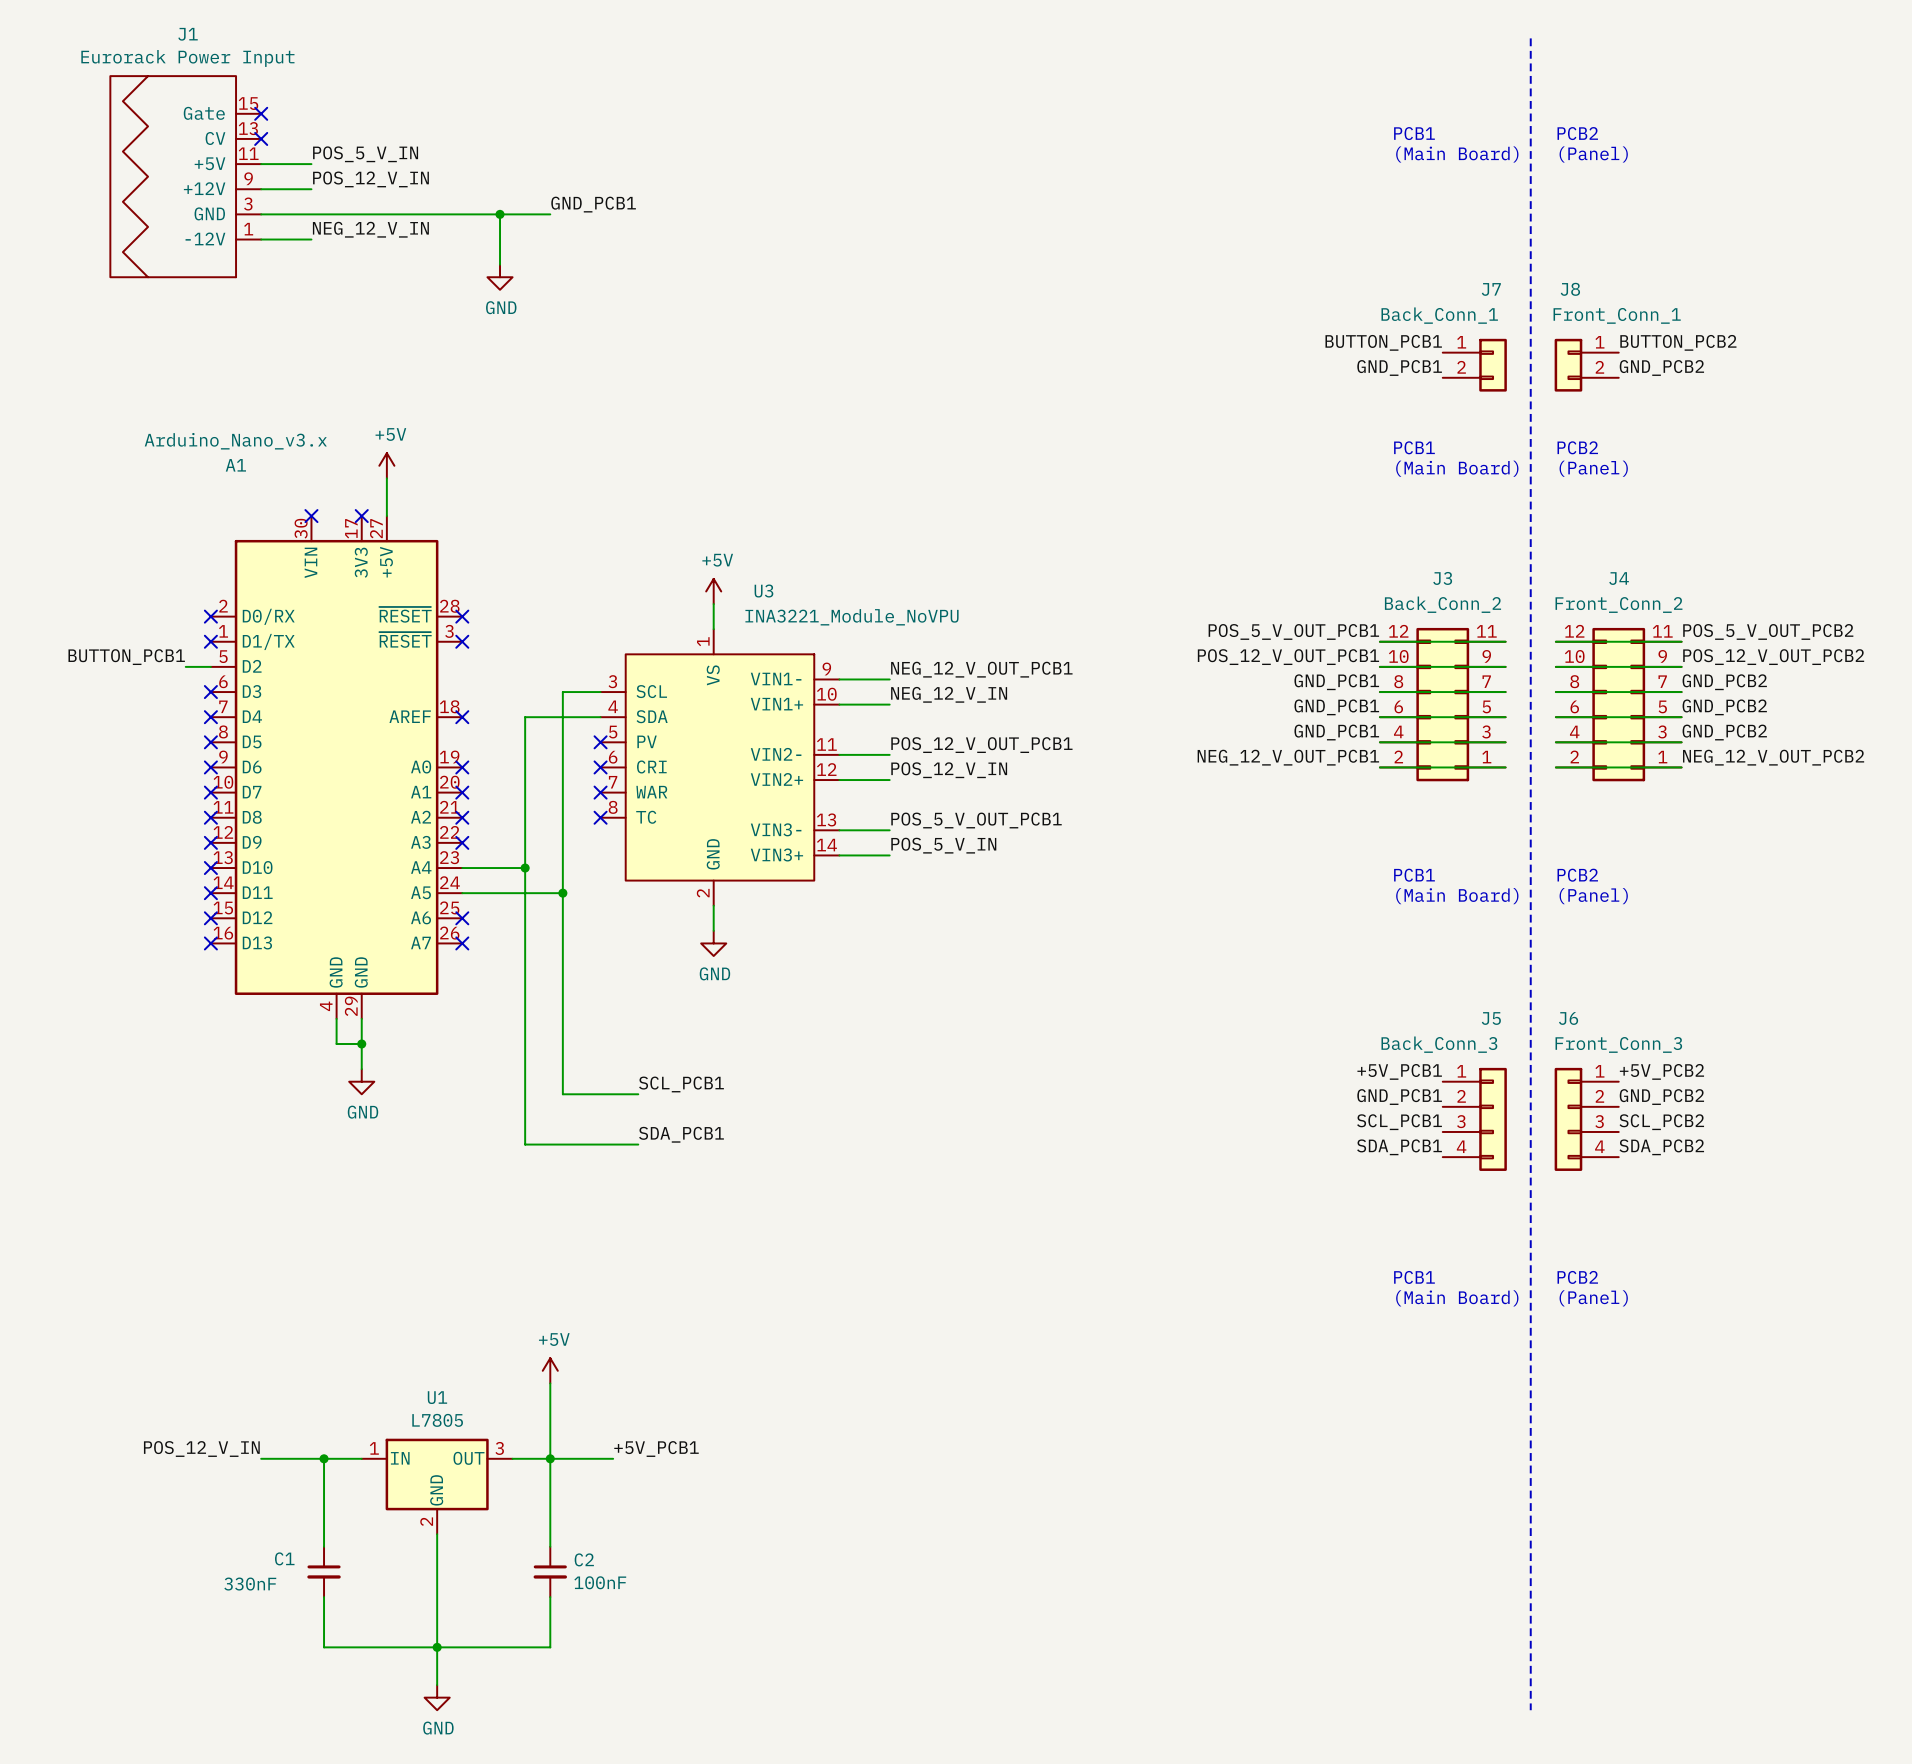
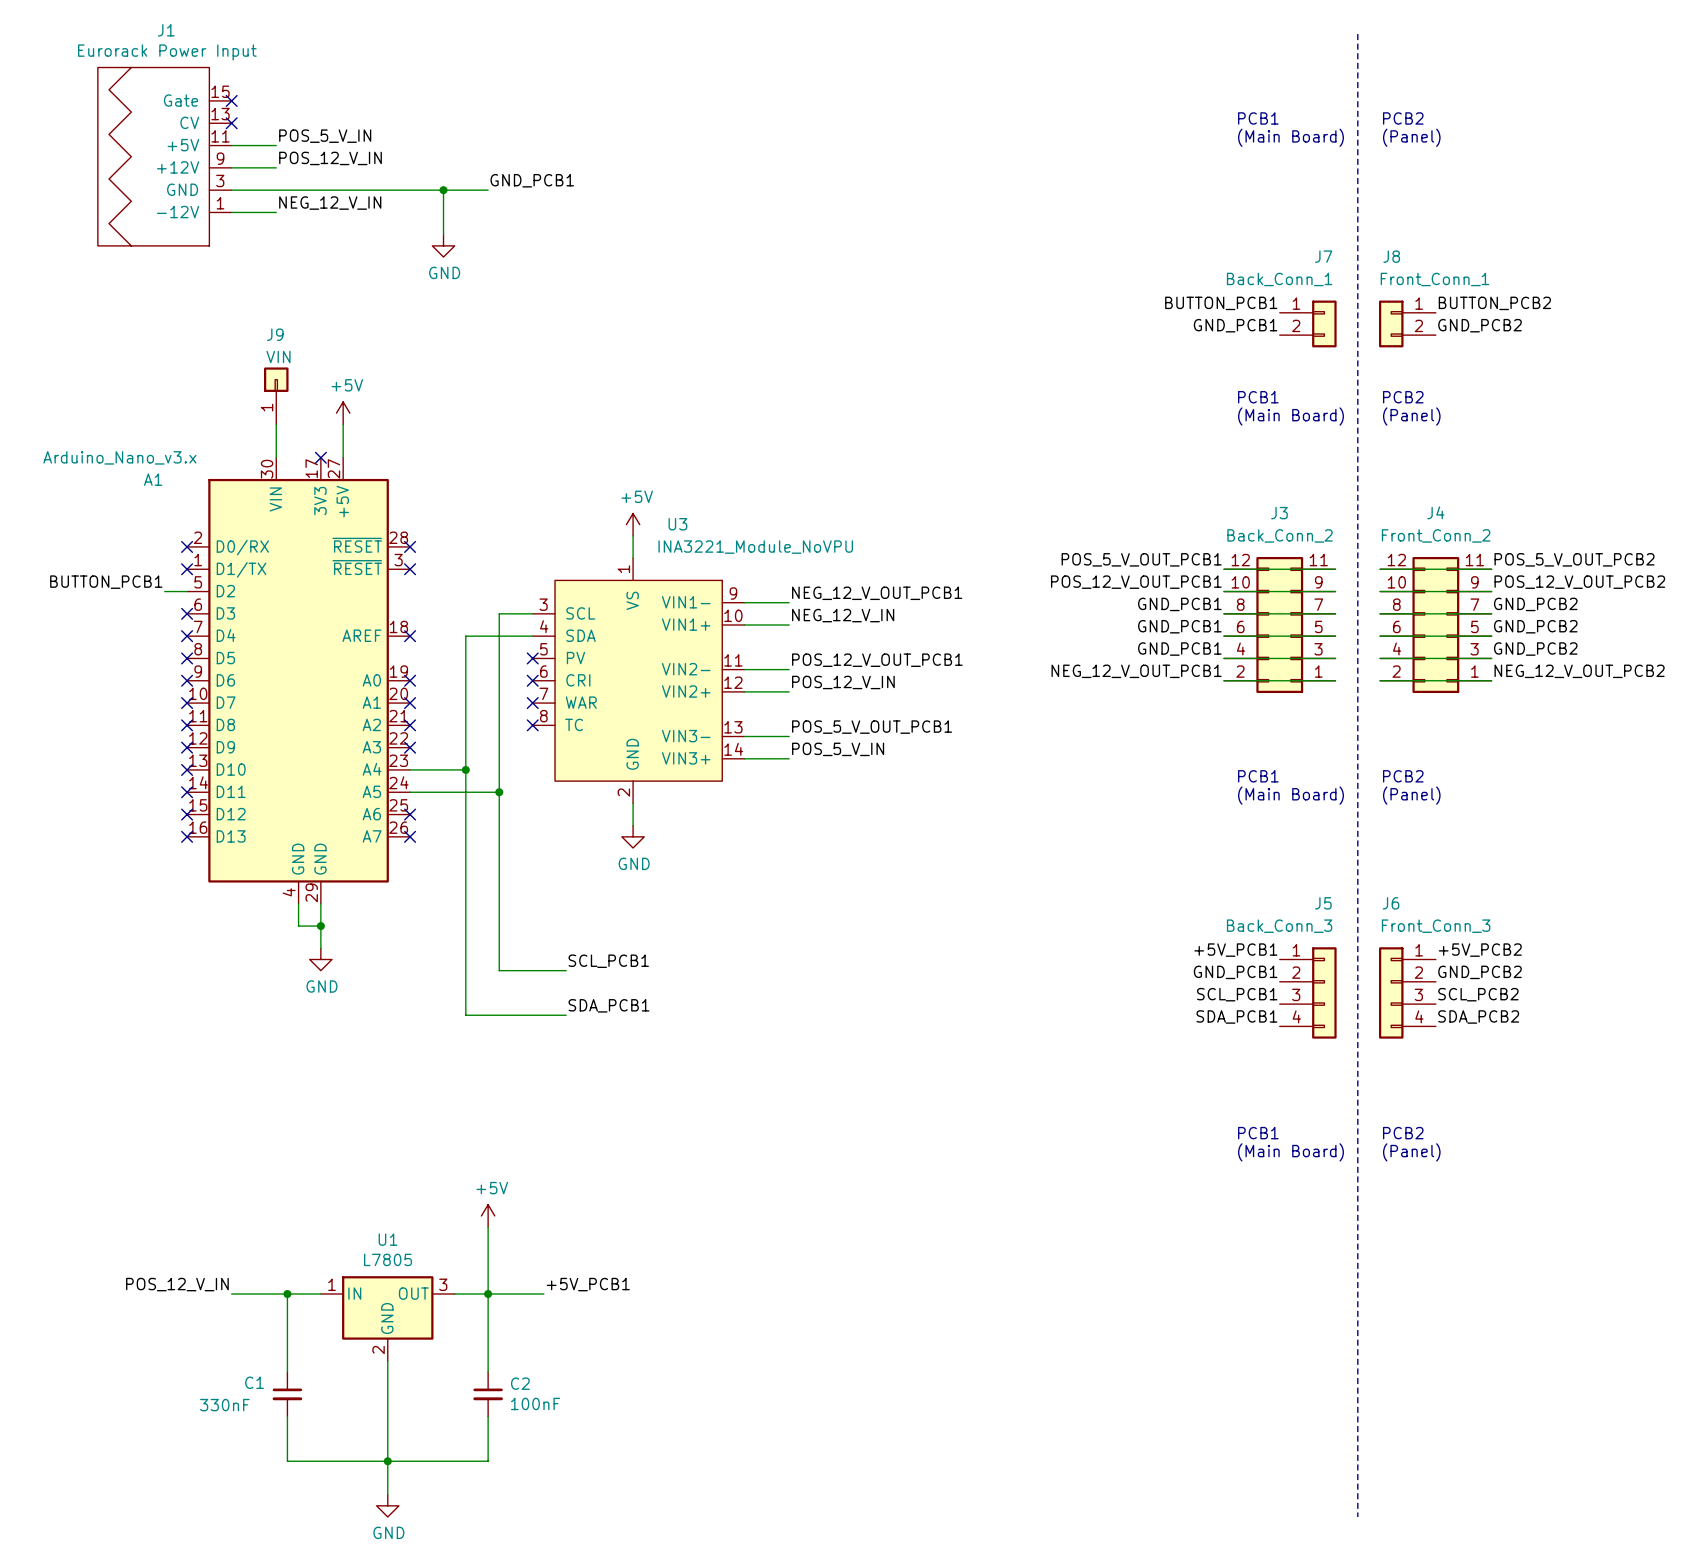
A1 value position: Arduino_Nano_v3.x (235, 441) -> Arduino_Nano_v3.x (119, 457)
J9: none -> VIN (276, 395)
A1 name position: A1 (235, 465) -> A1 (153, 479)
wire: none -> (276, 424) (276, 457)
no-connect mark: (311, 516) -> none

